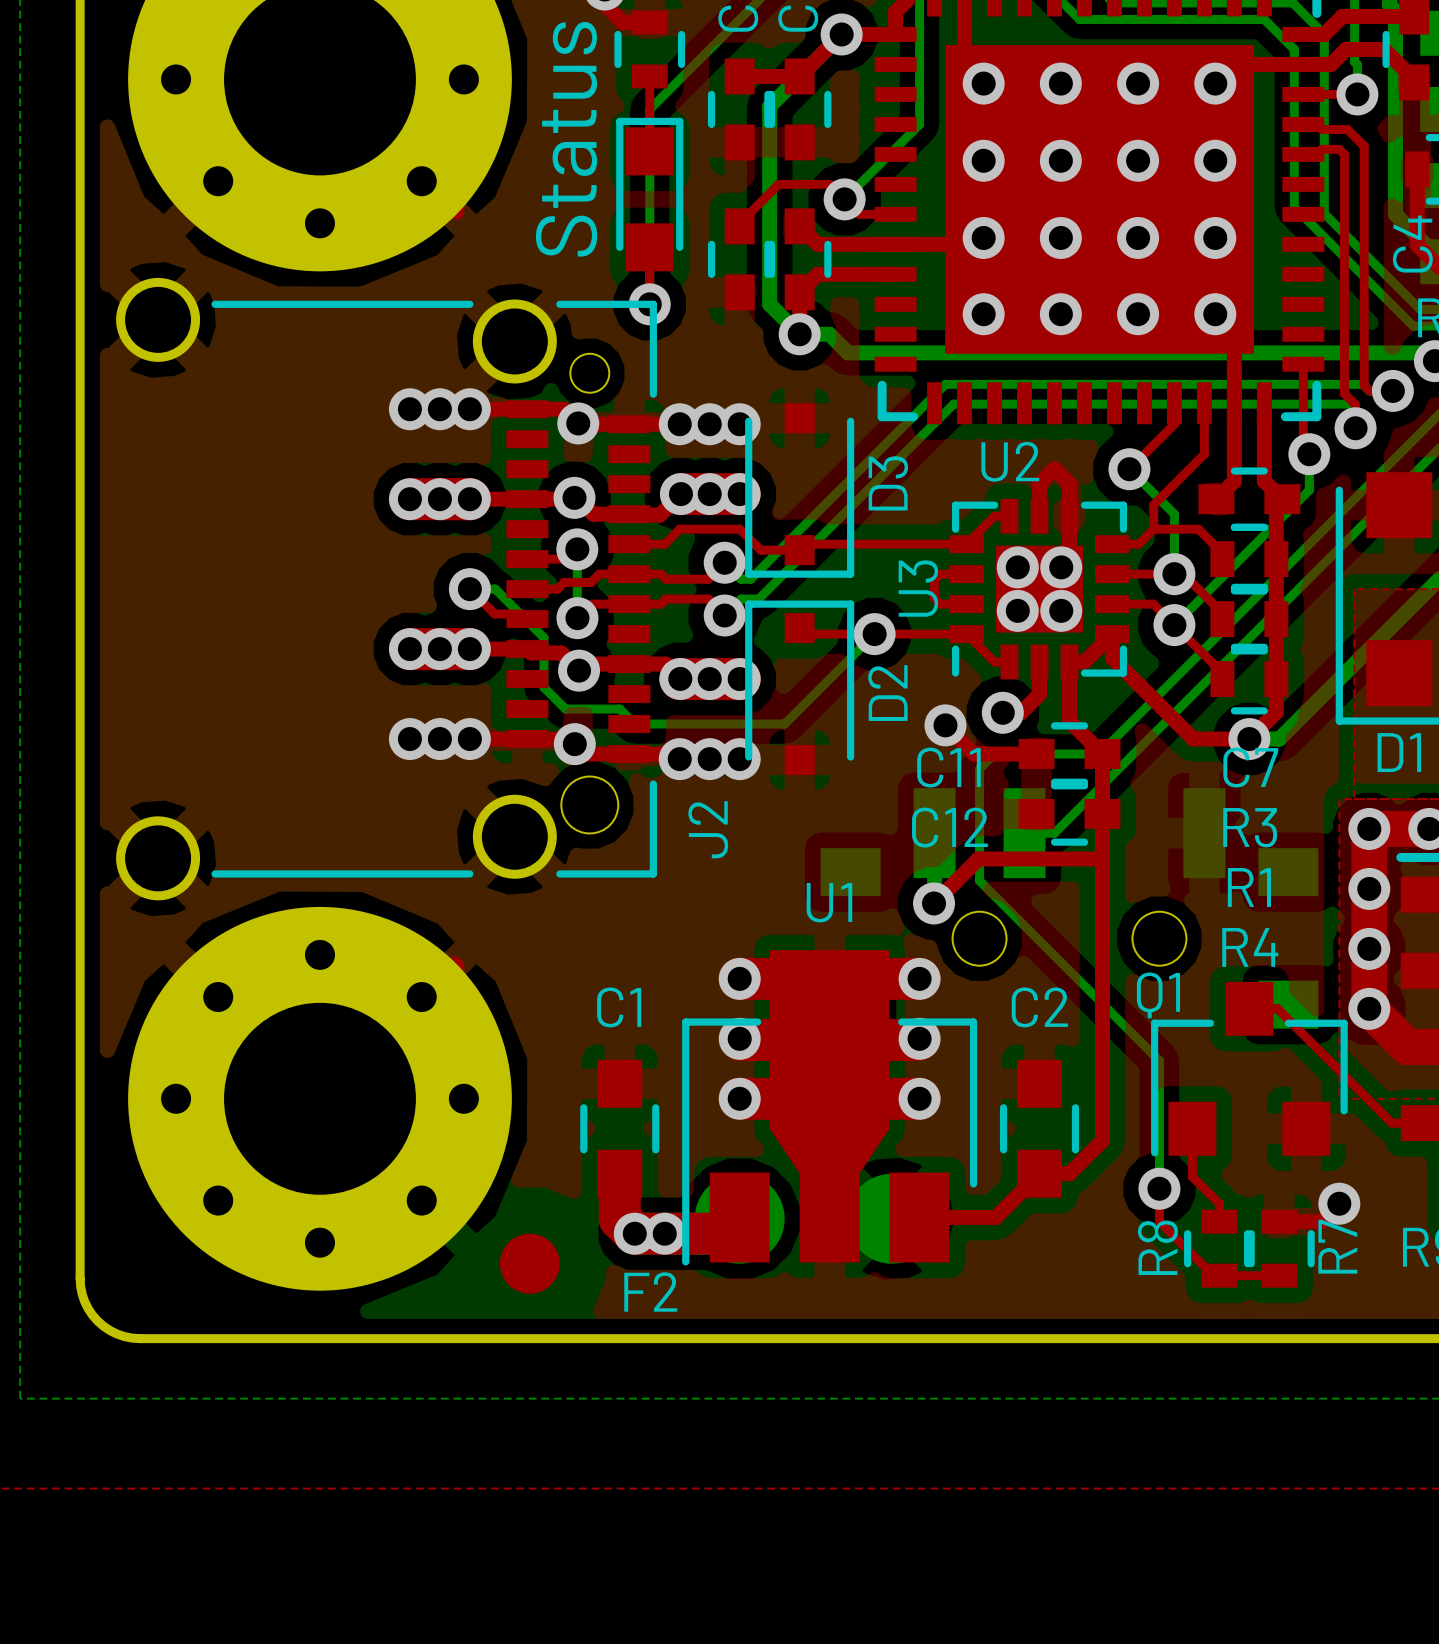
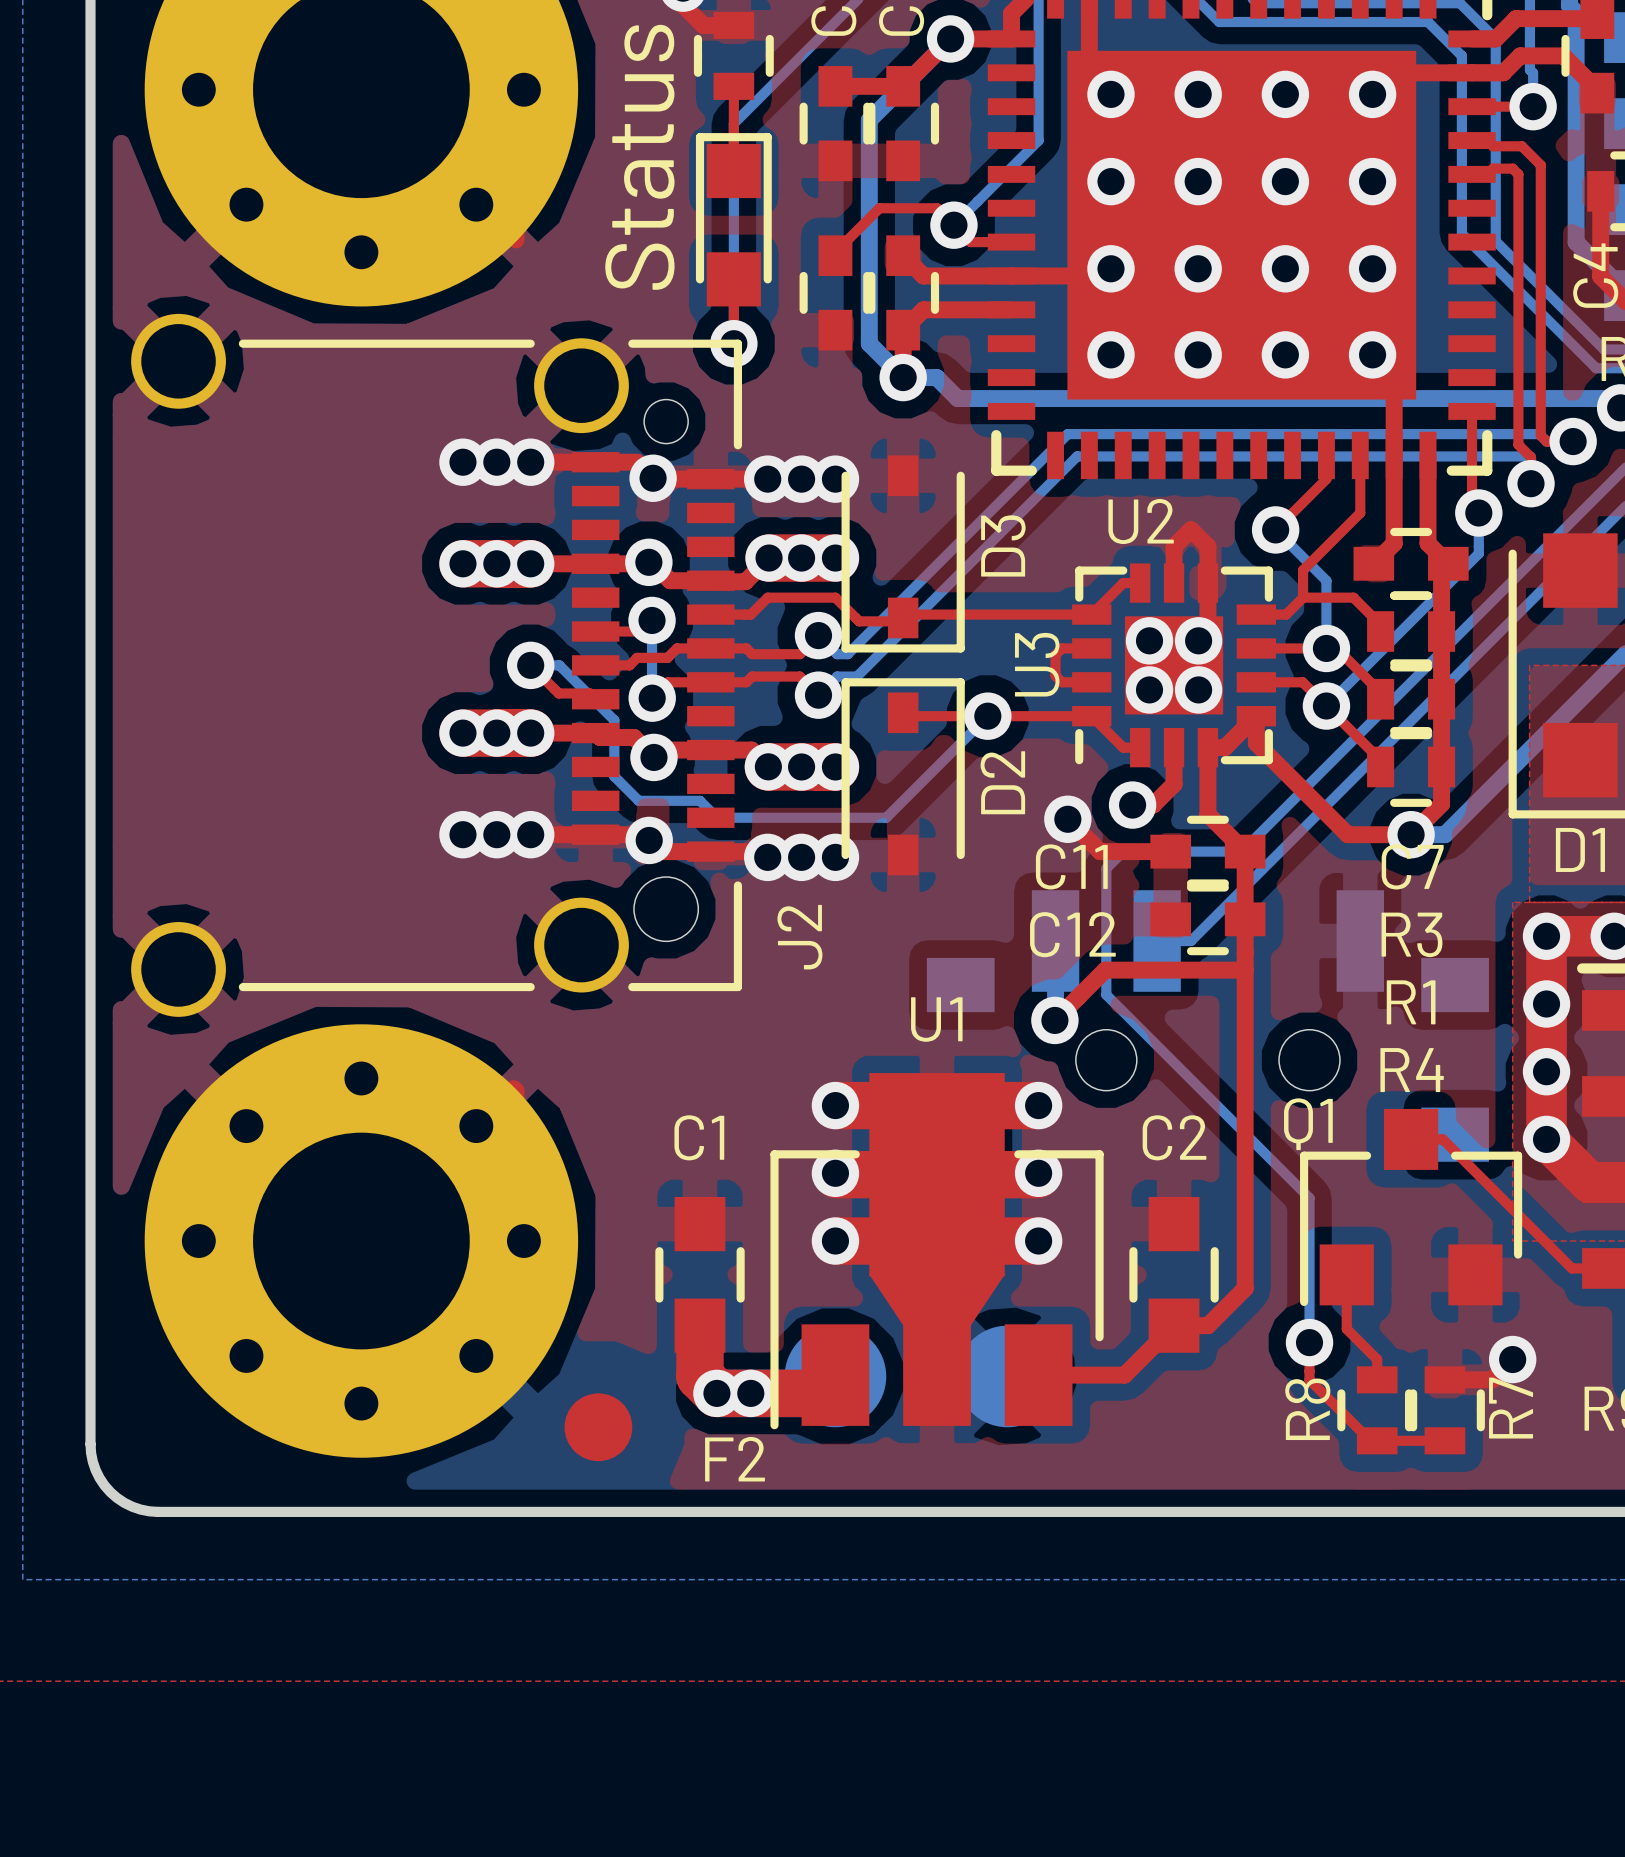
D3 footprint: [745, 403, 855, 578] -> [841, 455, 965, 653]
D2 footprint: [745, 600, 855, 776] -> [841, 678, 965, 876]

